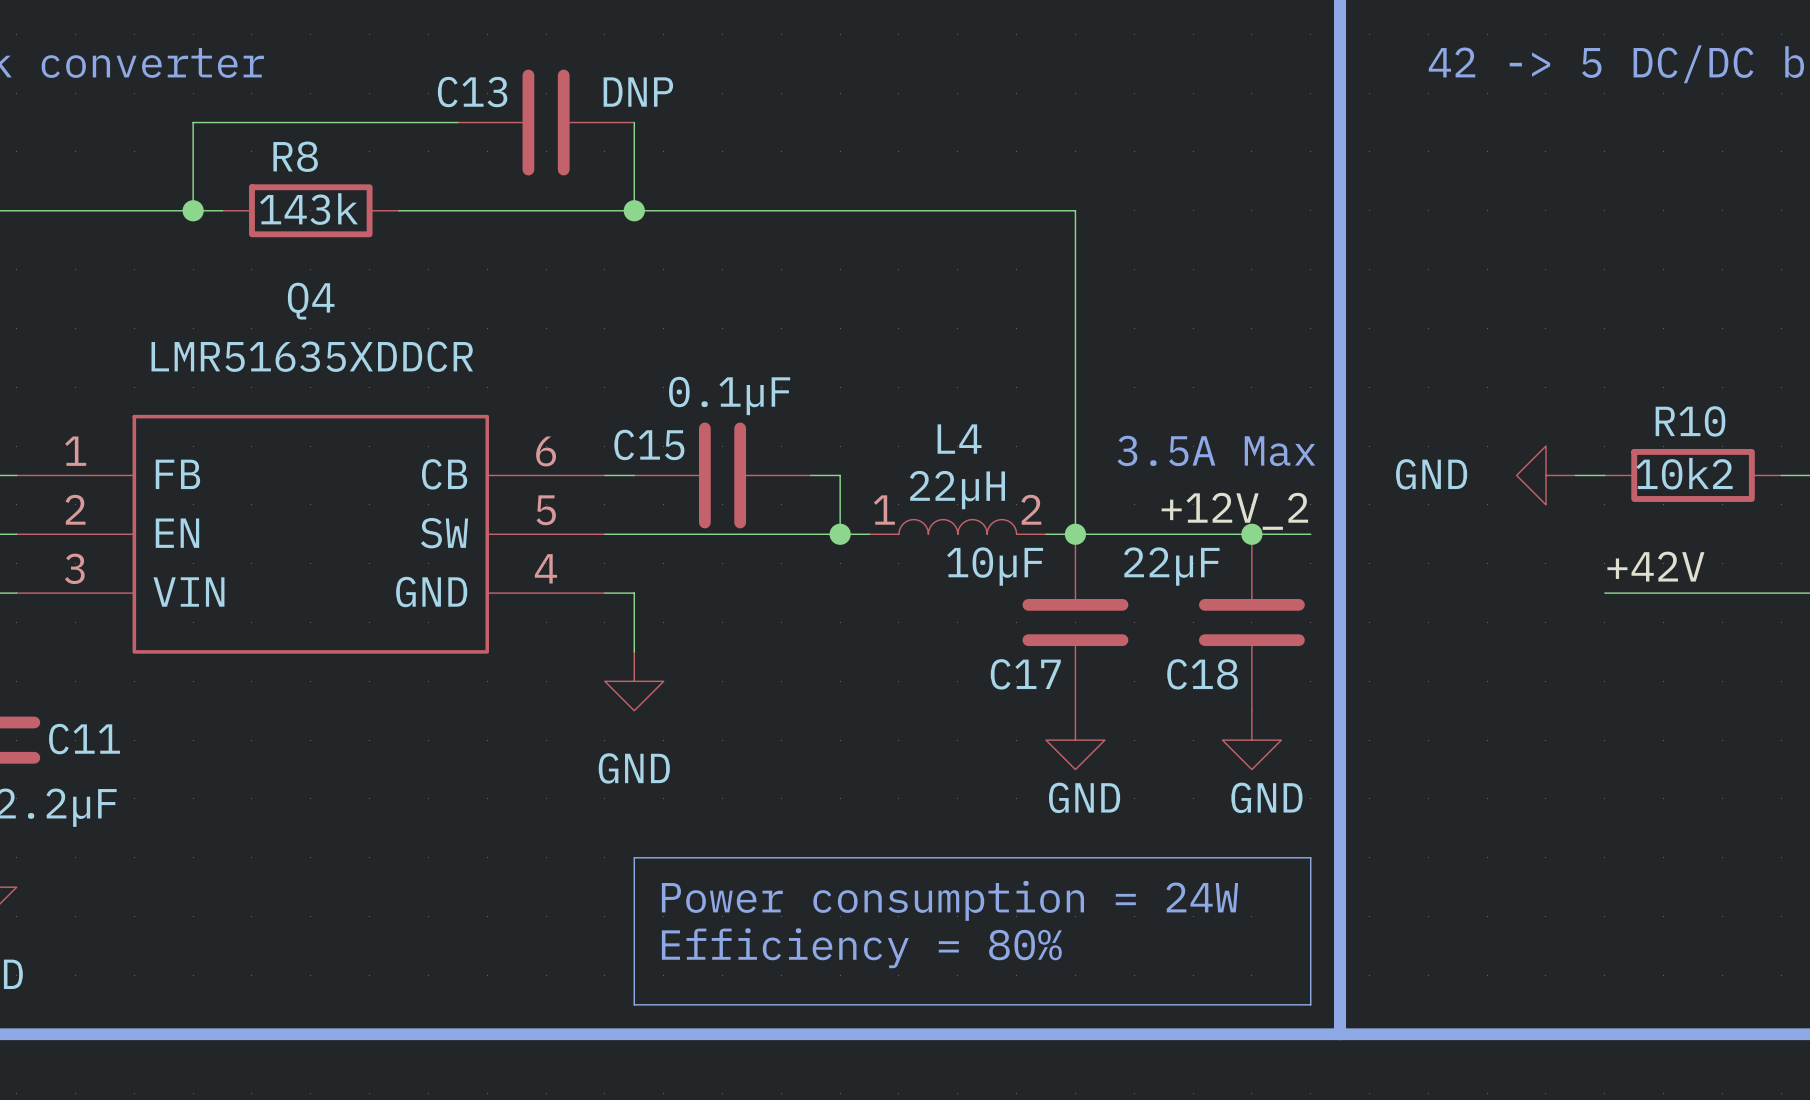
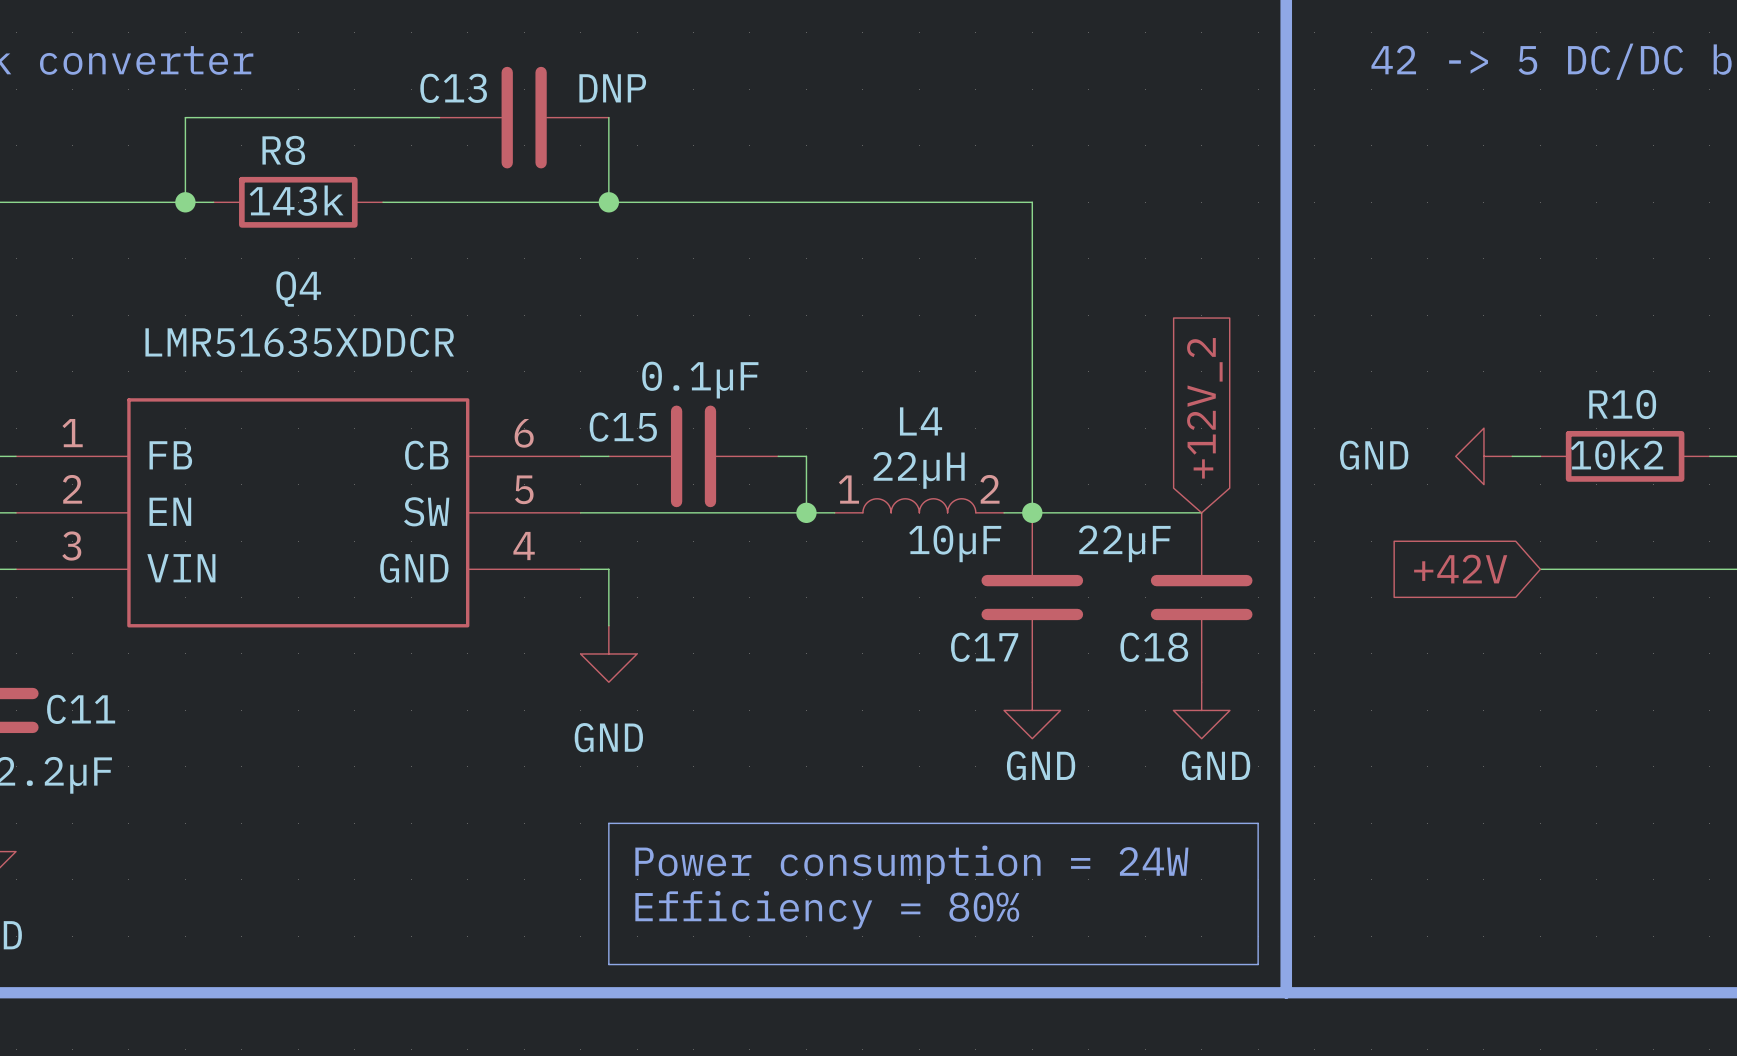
global label: none -> +12V_2 (1204, 408)
text: 3.5A Max (1216, 450) -> none
label: +12V_2 (1234, 511) -> none
wire: (1251, 534) (1310, 534) -> none
junction: (1251, 534) -> none
label: +42V (1655, 566) -> none
global label: none -> +42V (1460, 569)

